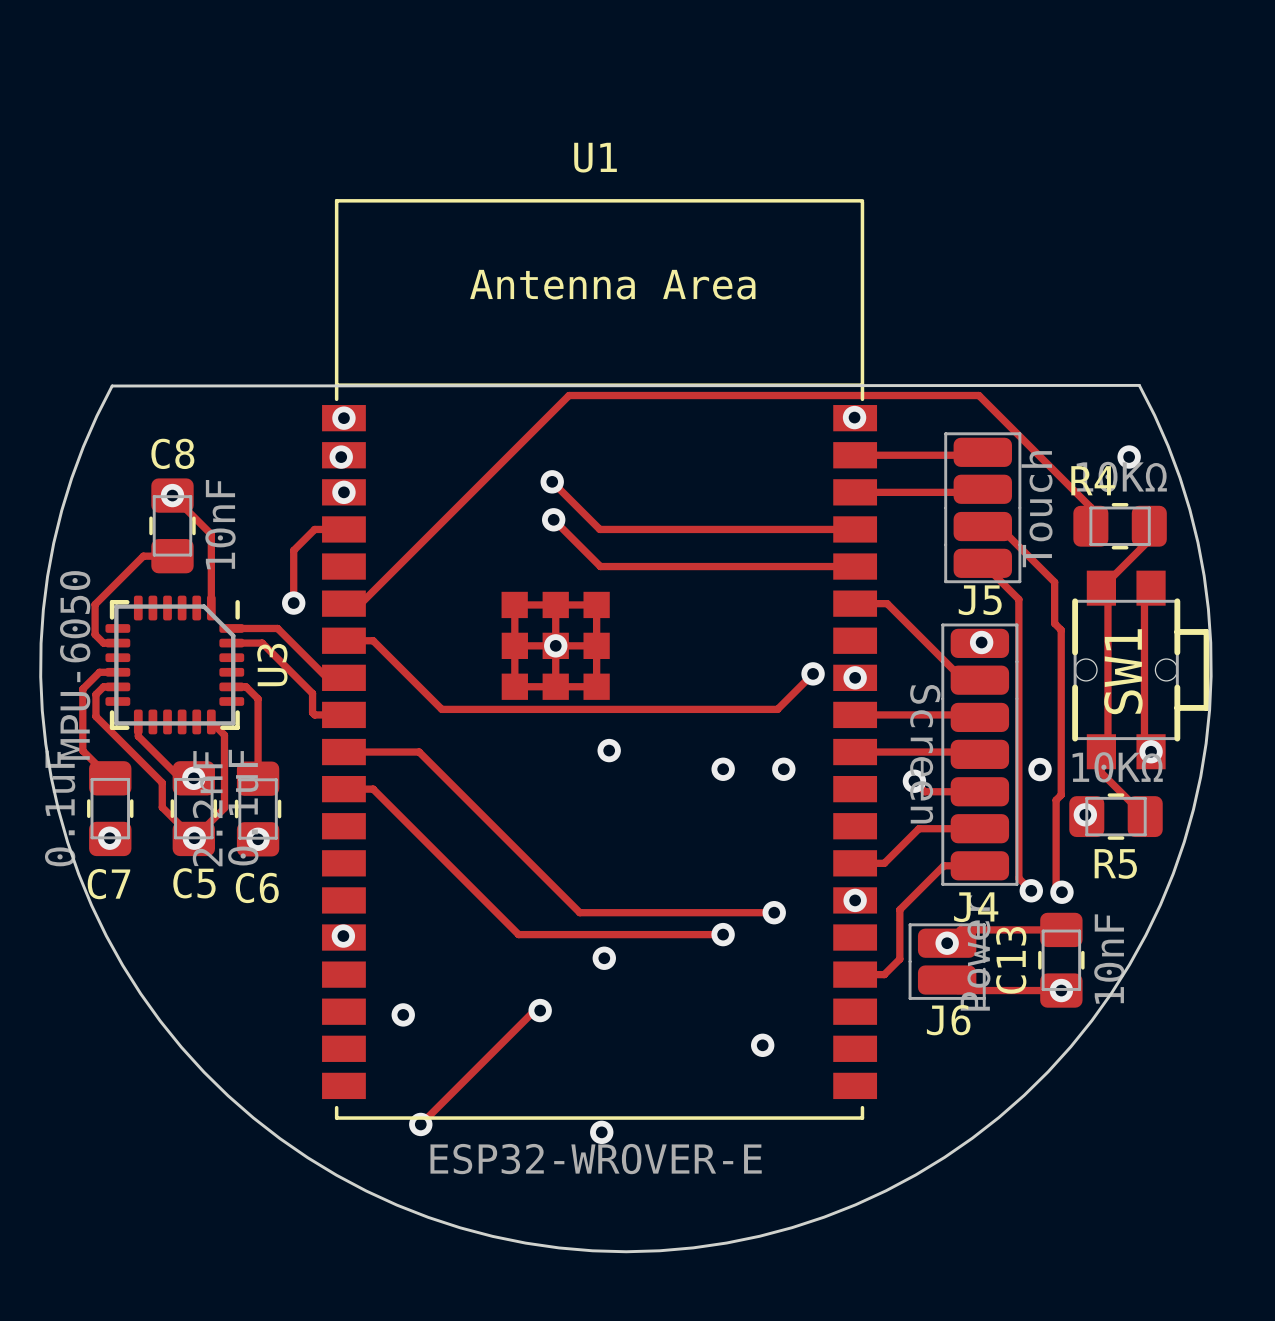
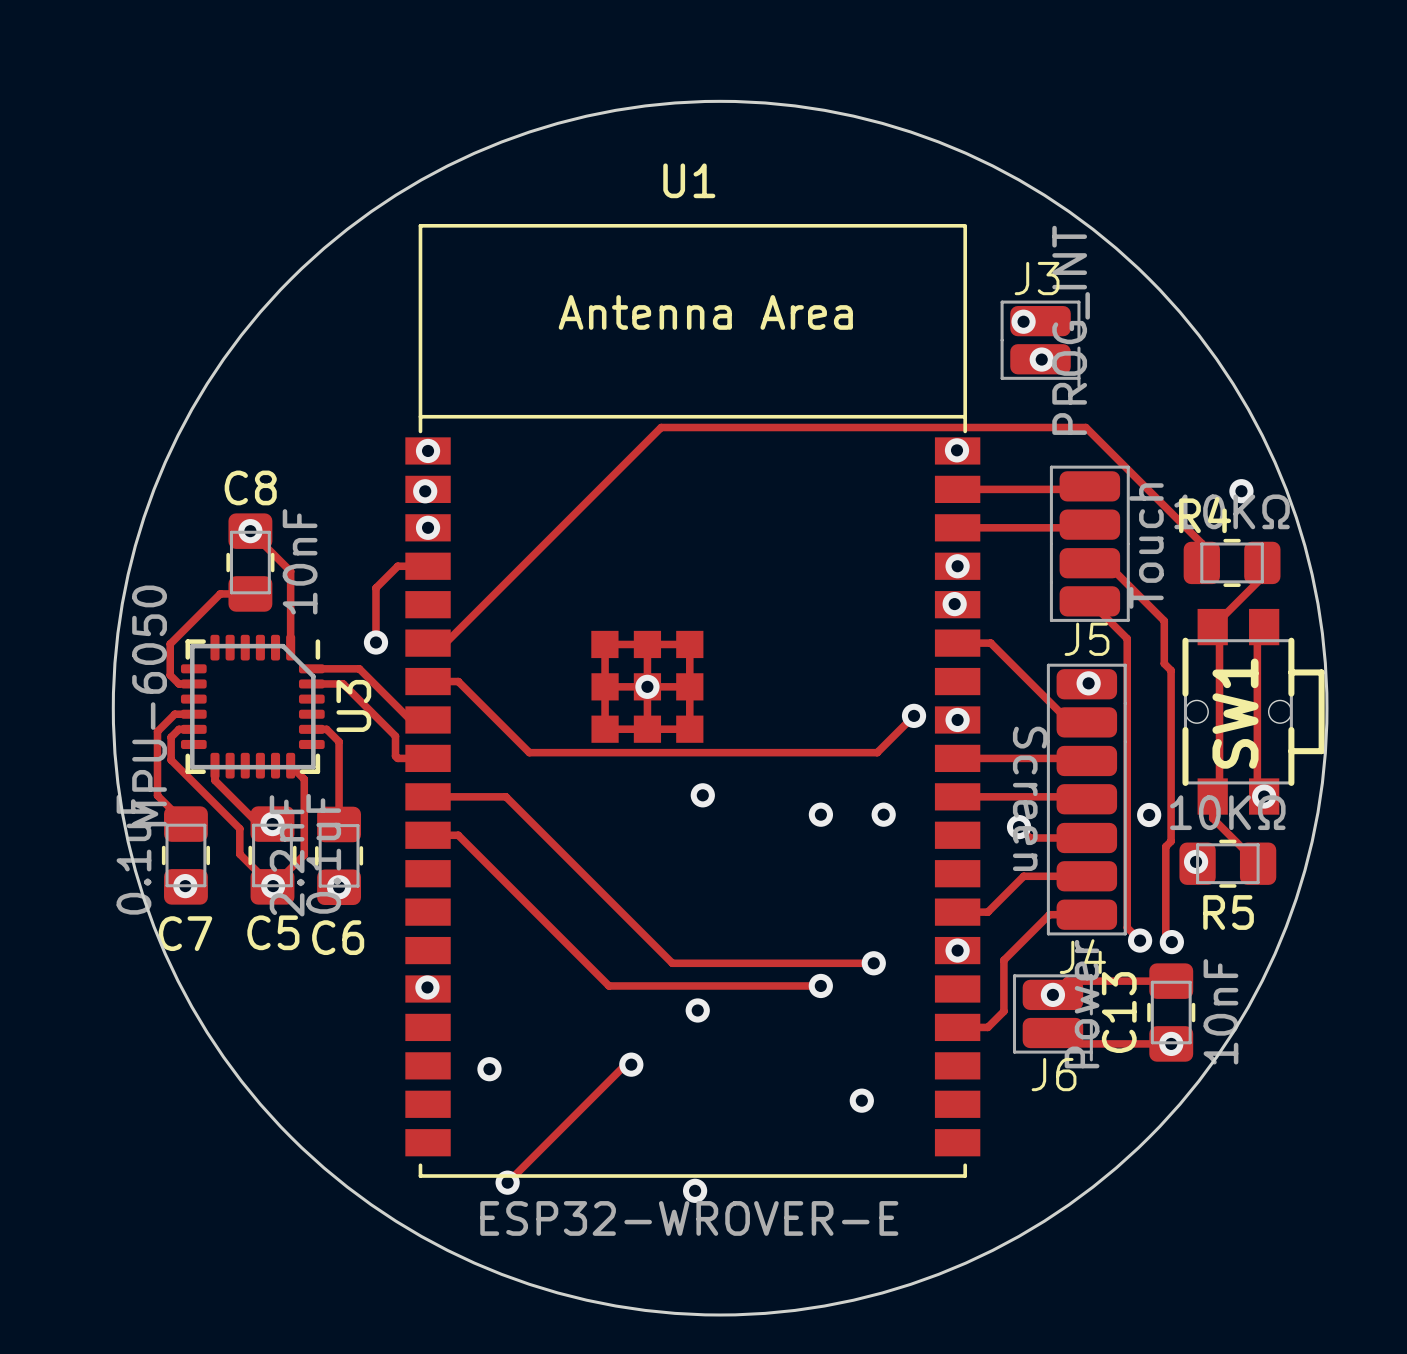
round board edge: none -> [111, 99, 1329, 1317]
via: none -> (1023, 321)
J3: none -> PROG_INT (1040, 344)
via: none -> (1041, 359)
board edge: (1139, 385) (112, 386) (83, 446) (61, 510) (47, 576) (41, 643) (42, 710) (51, 777) (67, 842) (91, 905) (106, 935) (140, 993) (181, 1047) (228, 1095) (253, 1117) (307, 1157) (366, 1191) (396, 1205) (460, 1227) (492, 1236) (559, 1247) (626, 1251) (693, 1247) (759, 1236) (824, 1217) (855, 1204) (915, 1174) (972, 1138) (1024, 1095) (1070, 1046) (1091, 1020) (1111, 993) (1145, 935) (1173, 873) (1193, 809) (1200, 776) (1209, 710) (1210, 642) (1204, 575) (1197, 542) (1179, 477) (1168, 446) (1139, 385) -> none
track: (552, 481) (599, 529) (855, 529) -> none
via: (552, 481) -> none
track: (553, 519) (600, 566) (855, 566) -> none
via: (553, 519) -> none
via: none -> (957, 566)
via: none -> (954, 604)

